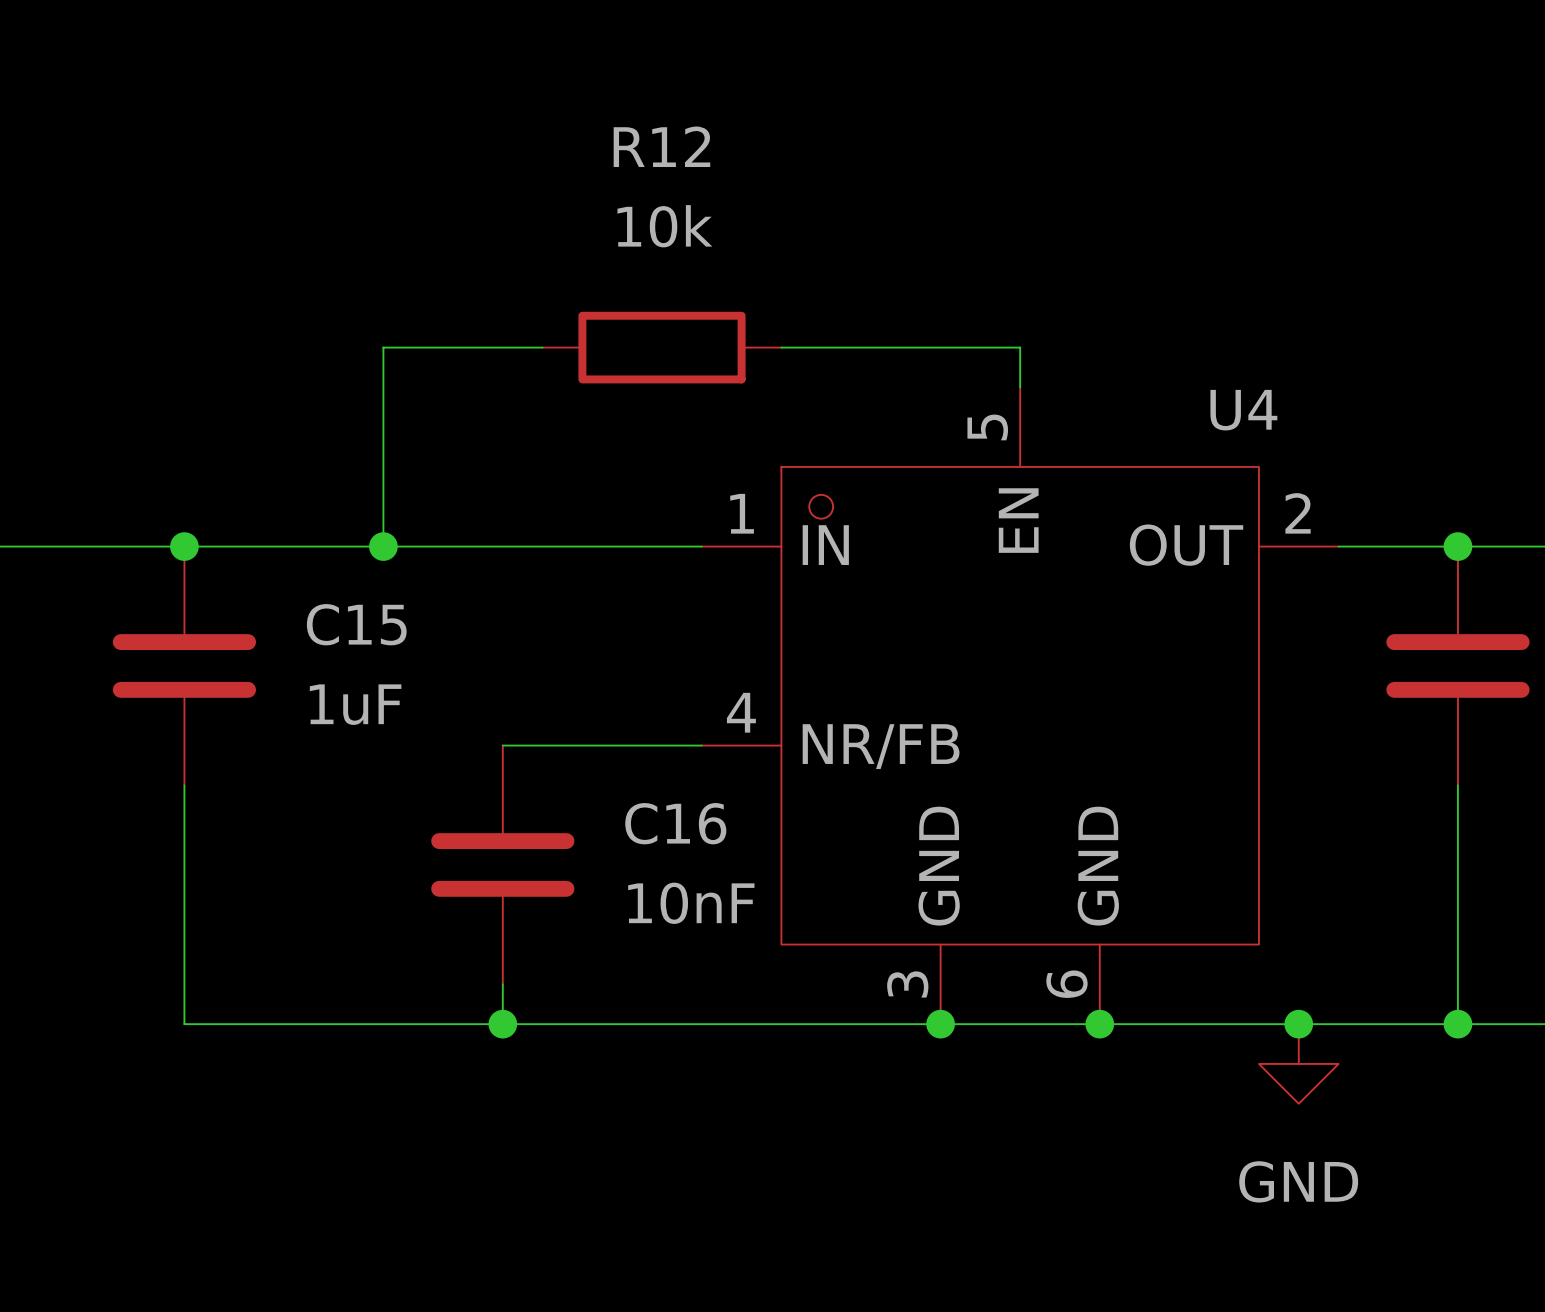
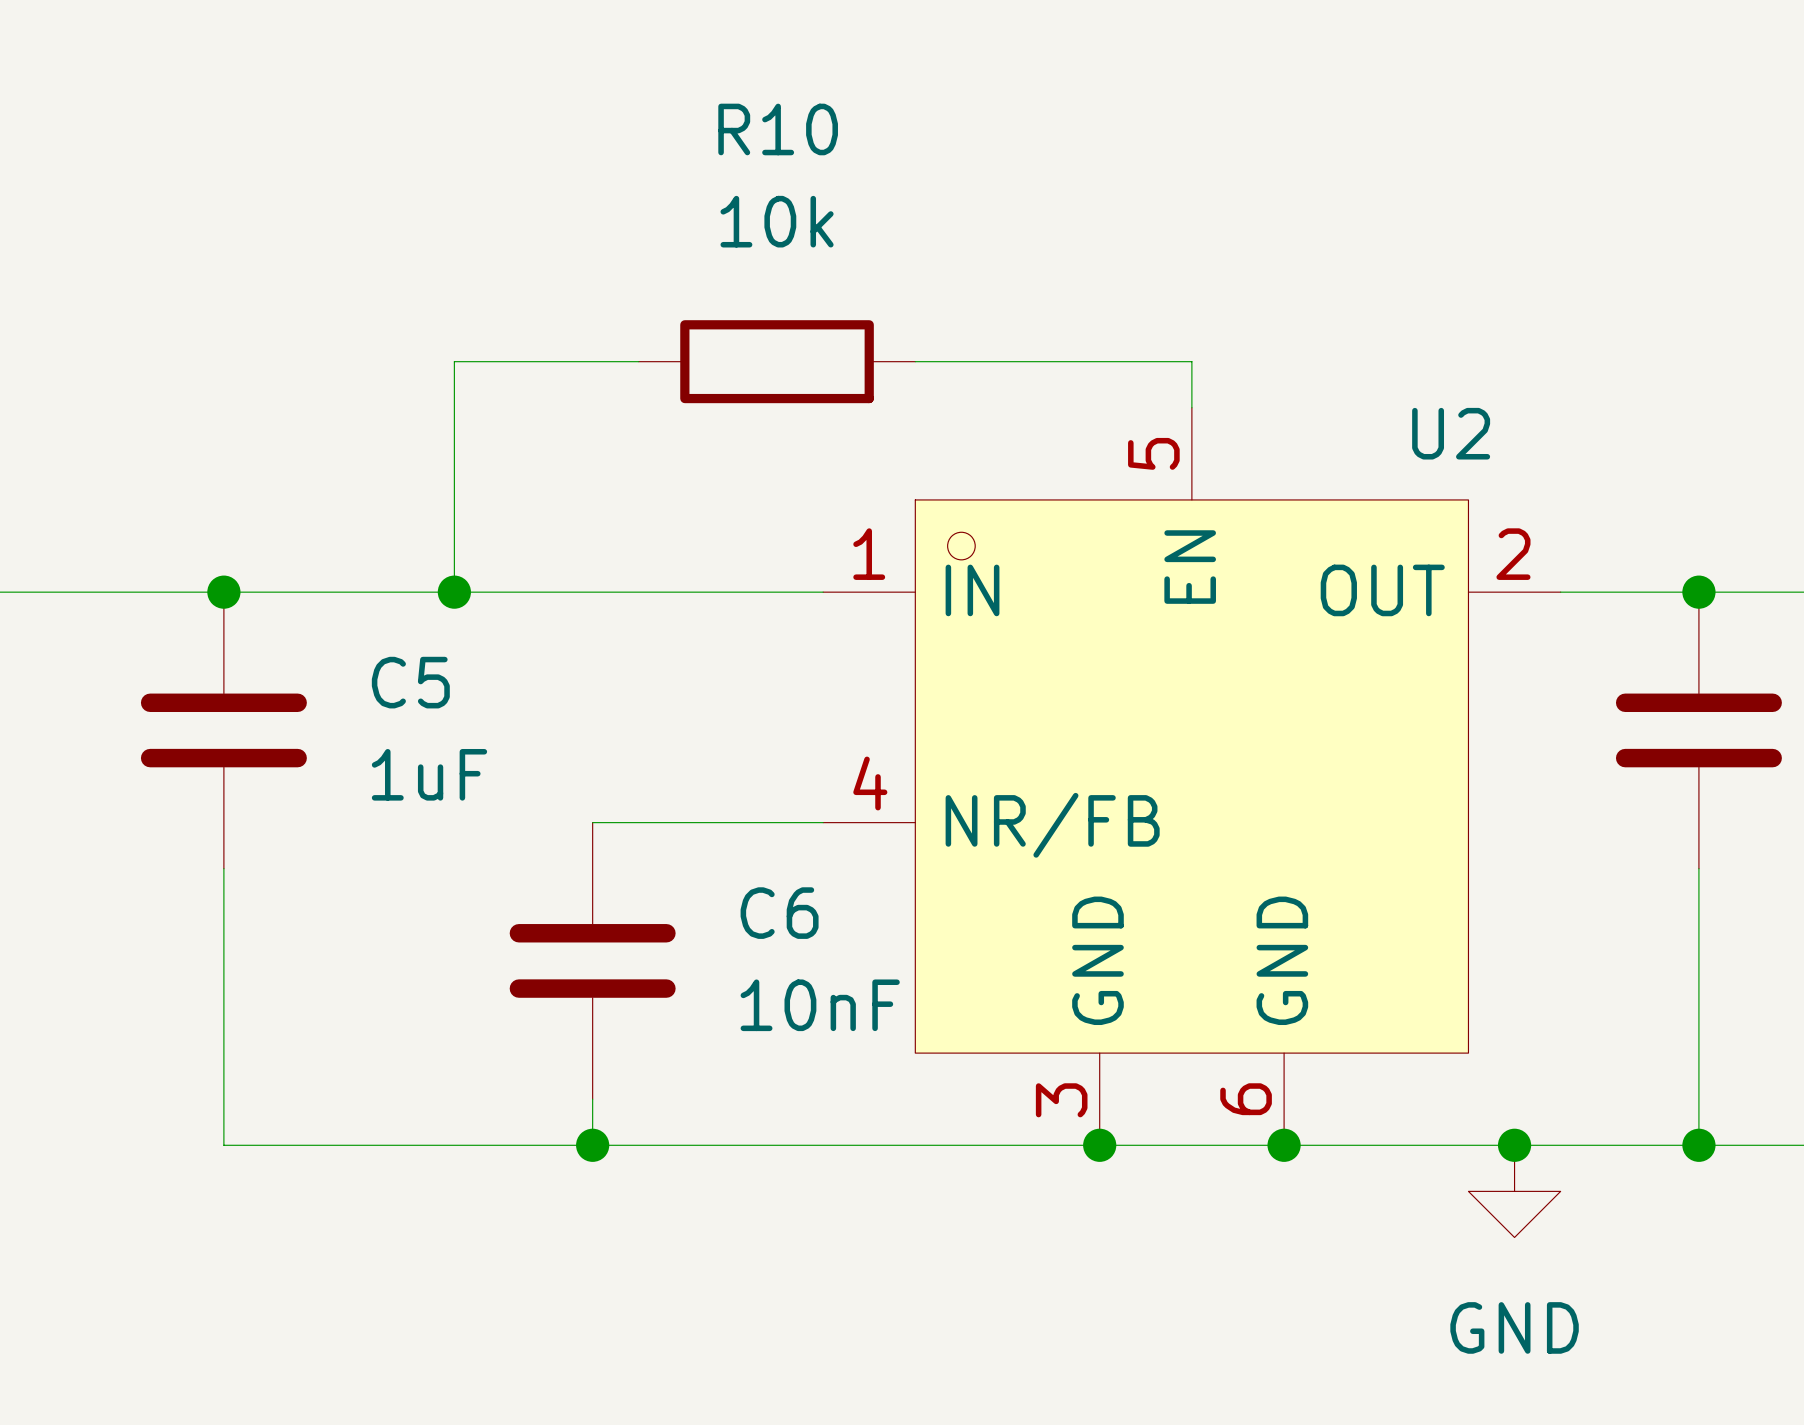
R12 name: R12 (661, 146) -> R10 (778, 129)
U4 name: U4 (1243, 410) -> U2 (1451, 433)
C15 name: C15 (356, 624) -> C5 (410, 682)
C16 name: C16 (675, 823) -> C6 (779, 913)

